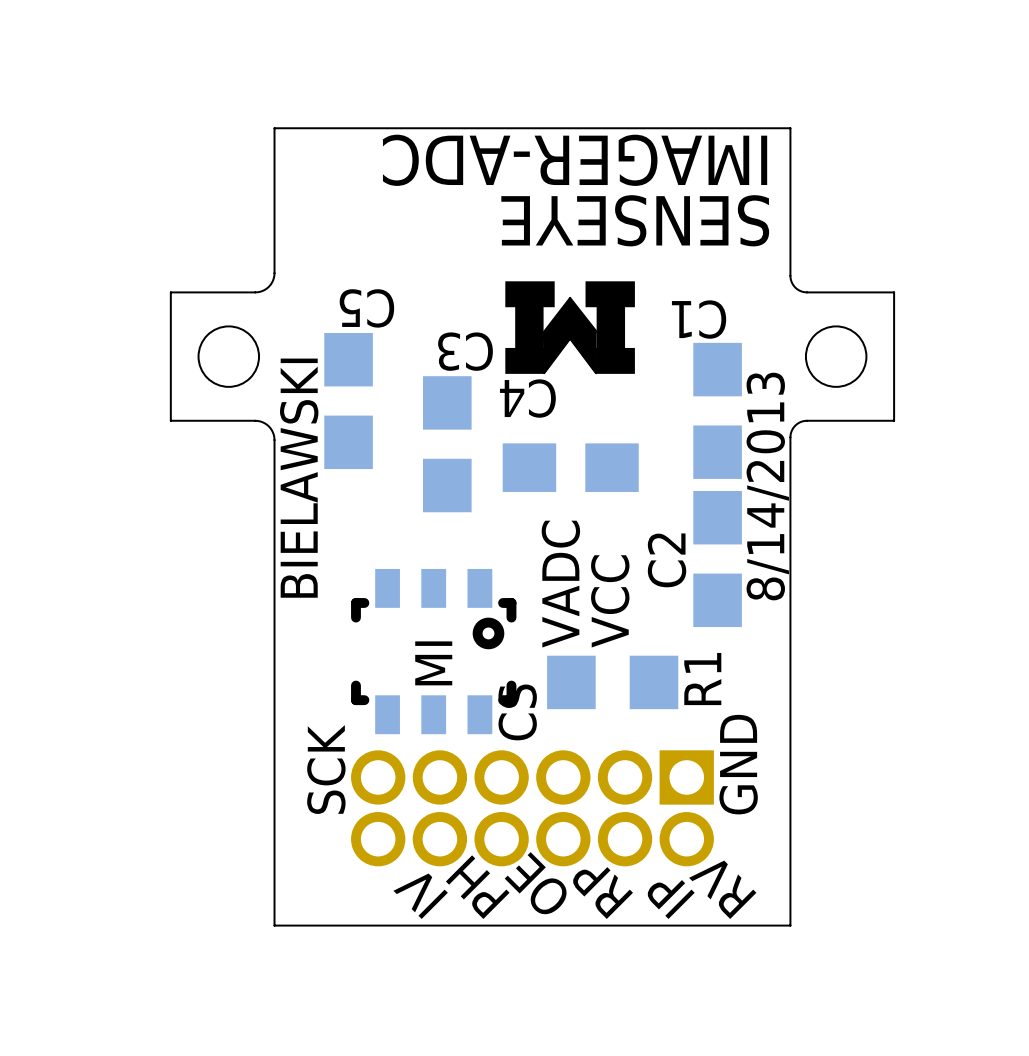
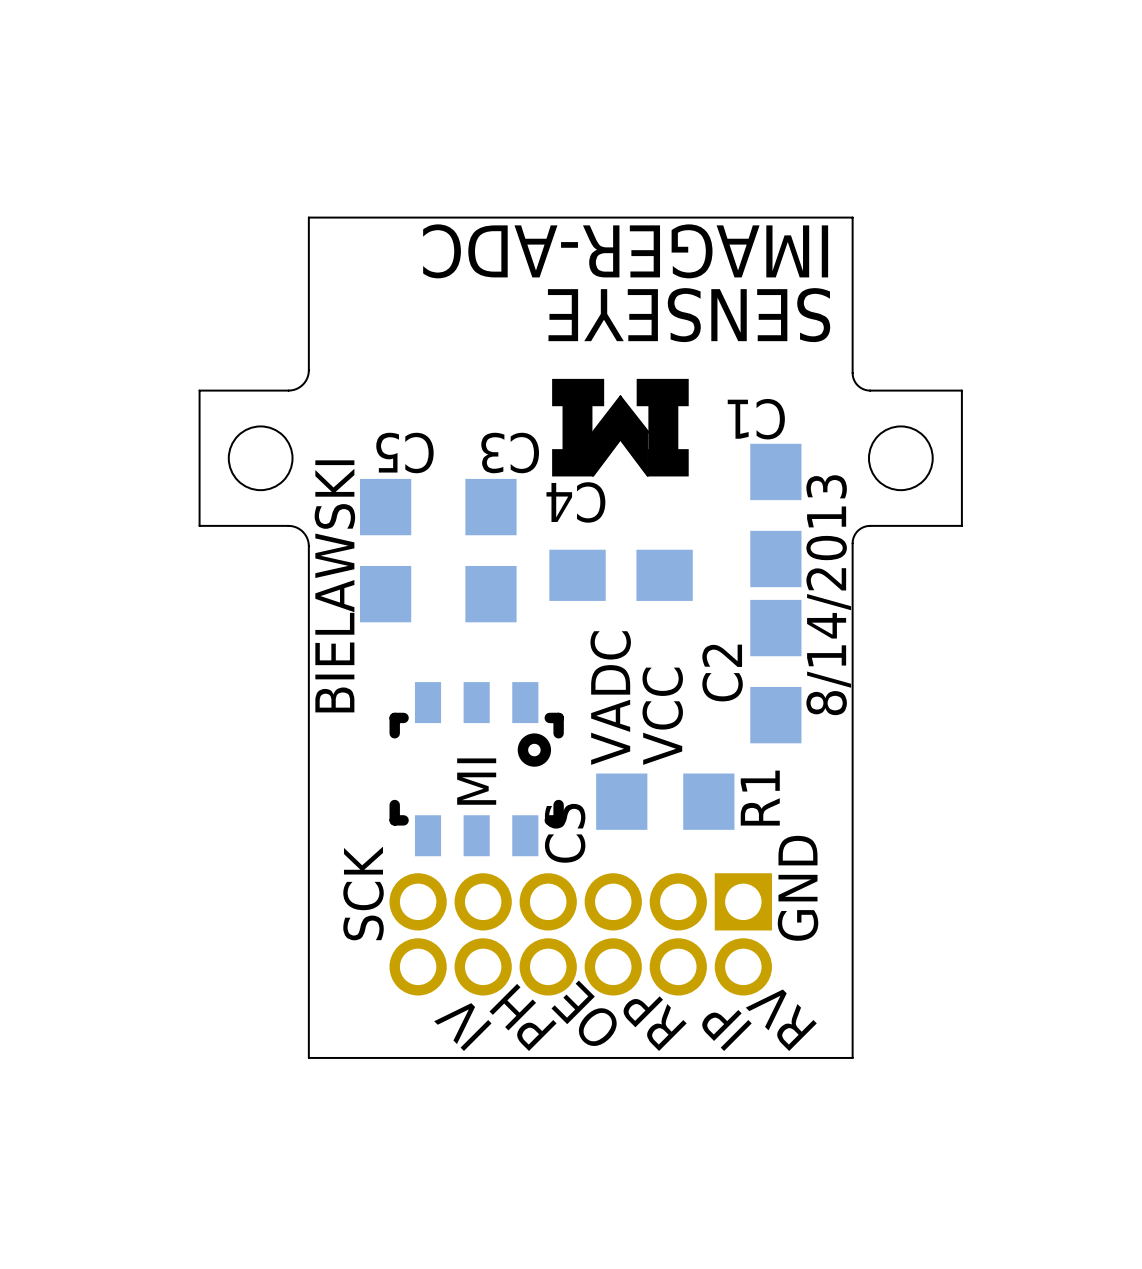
C5 position: (348, 401) -> (385, 550)

